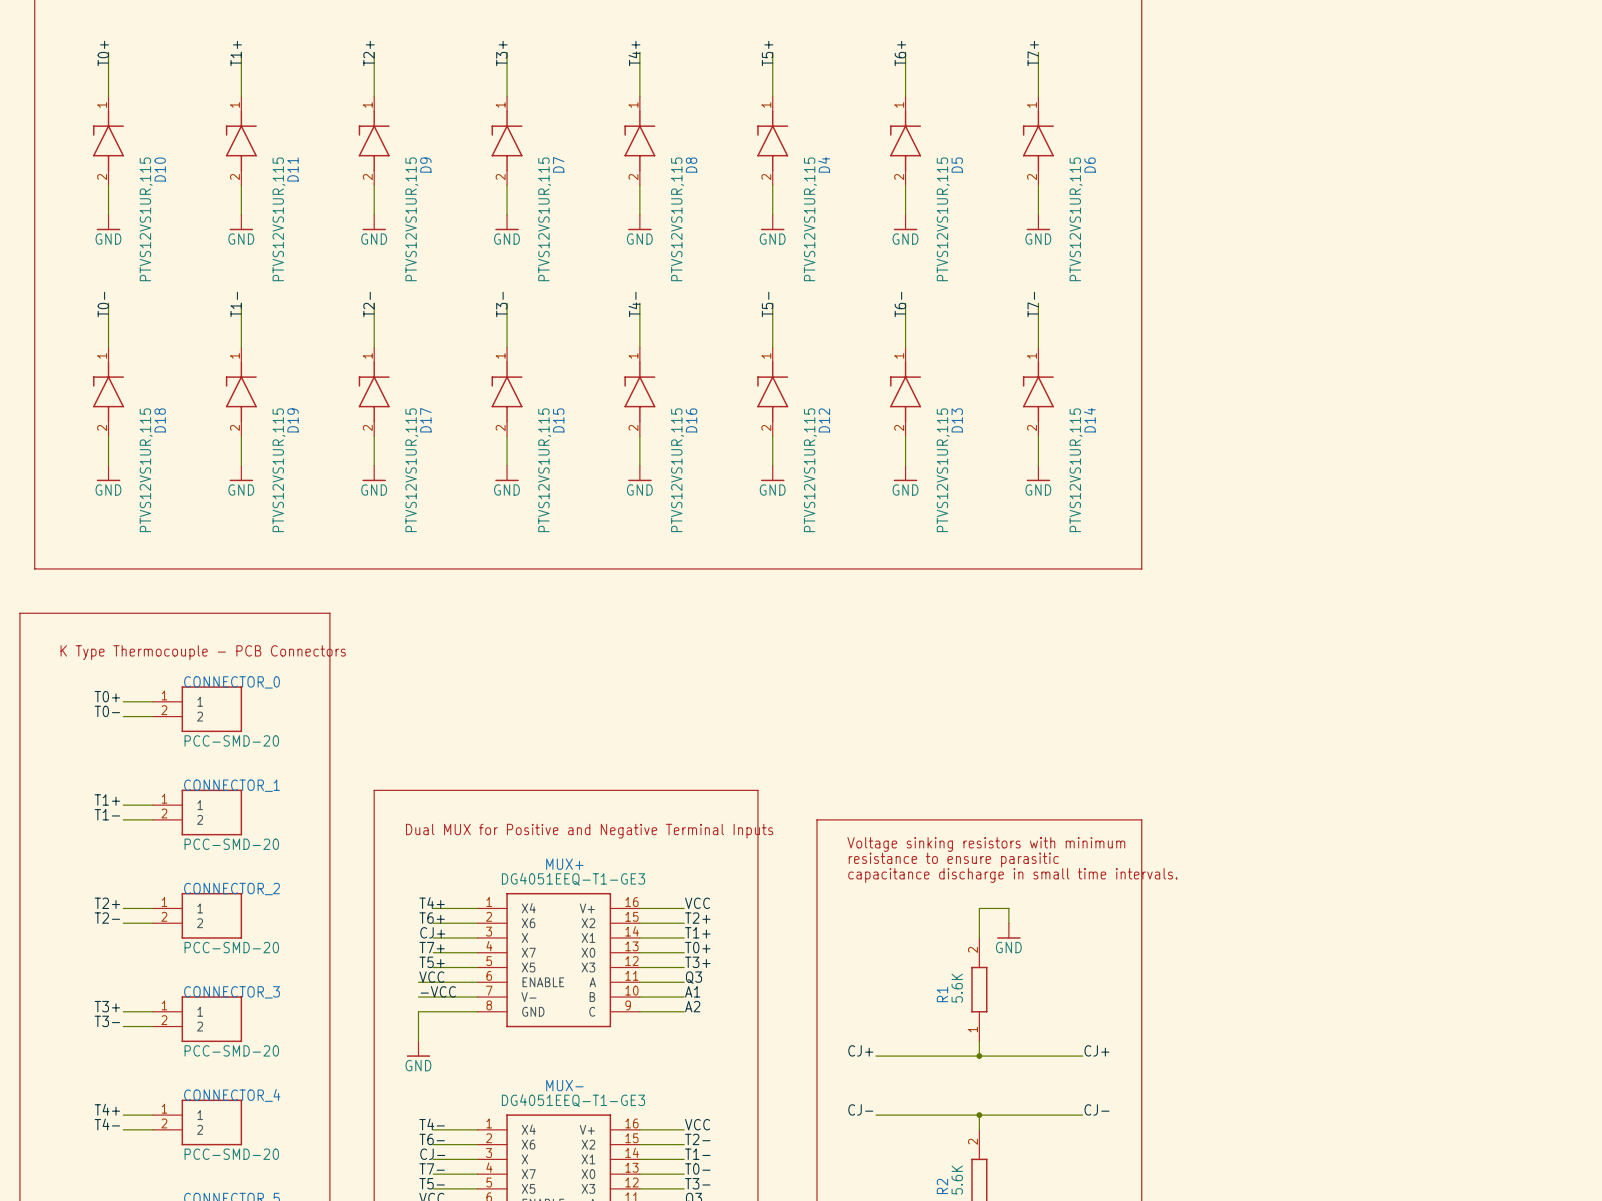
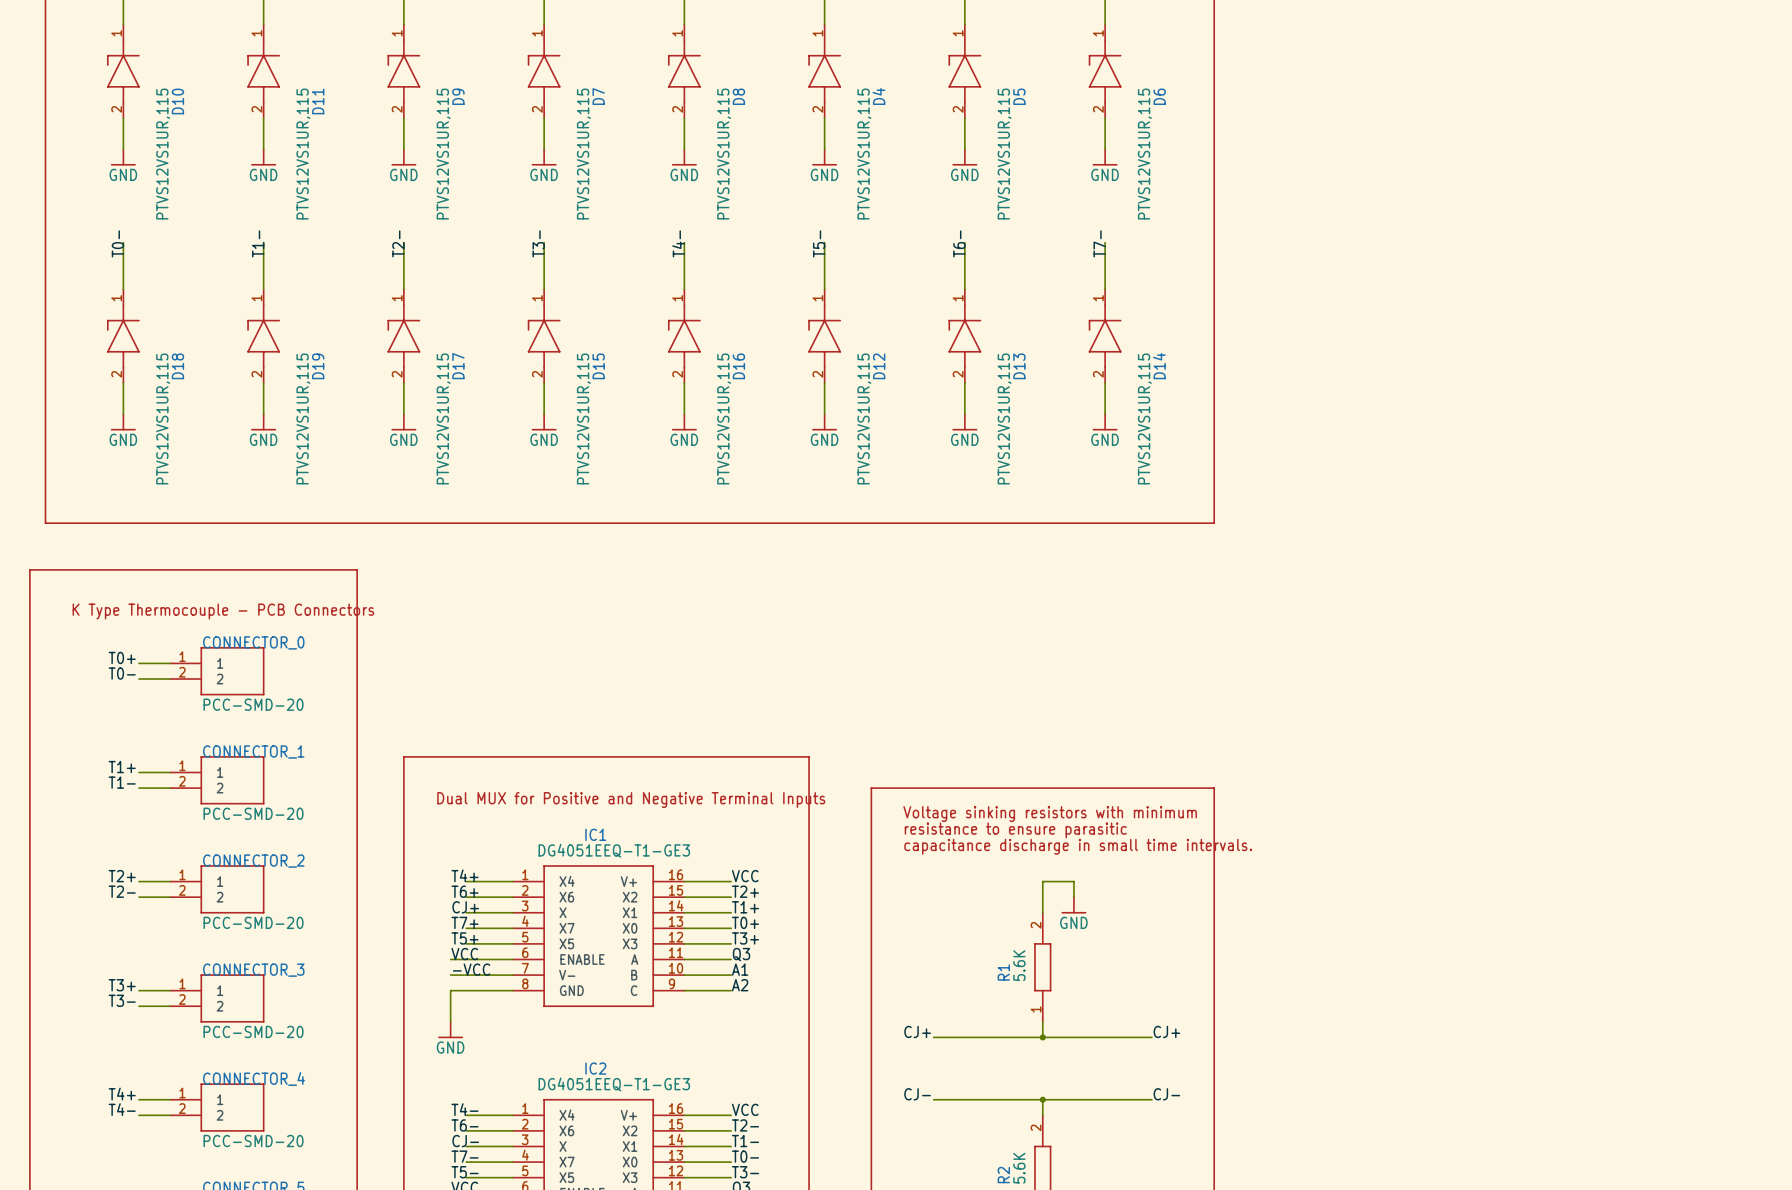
MUX+ name: MUX+ (564, 864) -> IC1 (595, 834)
MUX- name: MUX- (564, 1085) -> IC2 (595, 1068)

